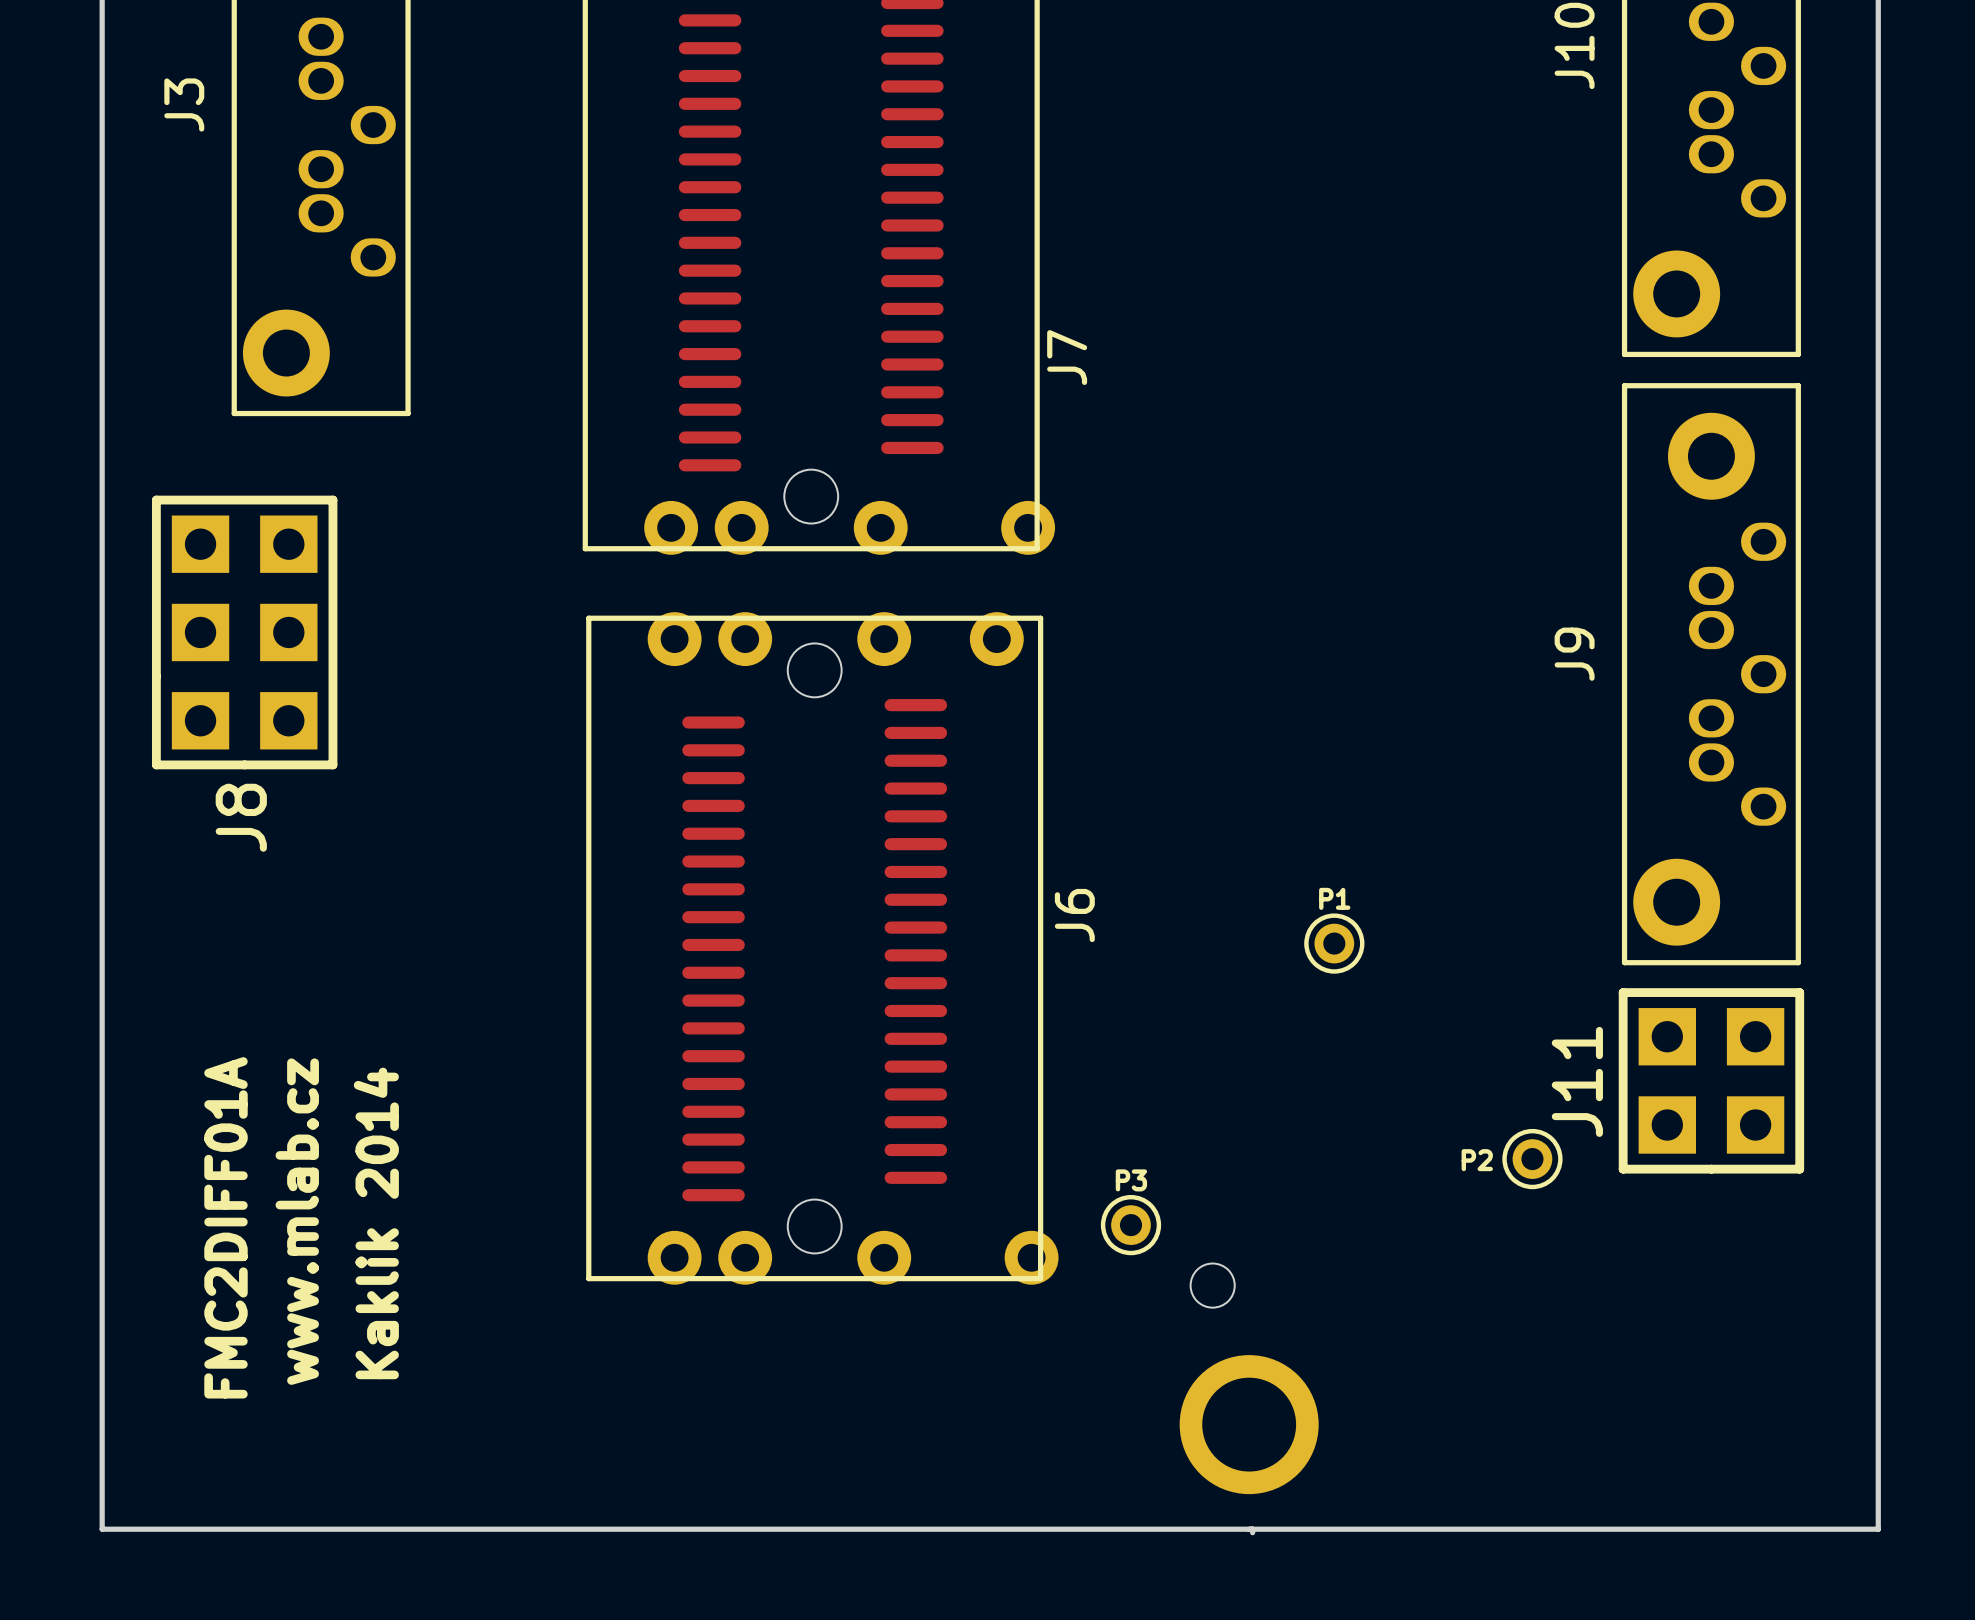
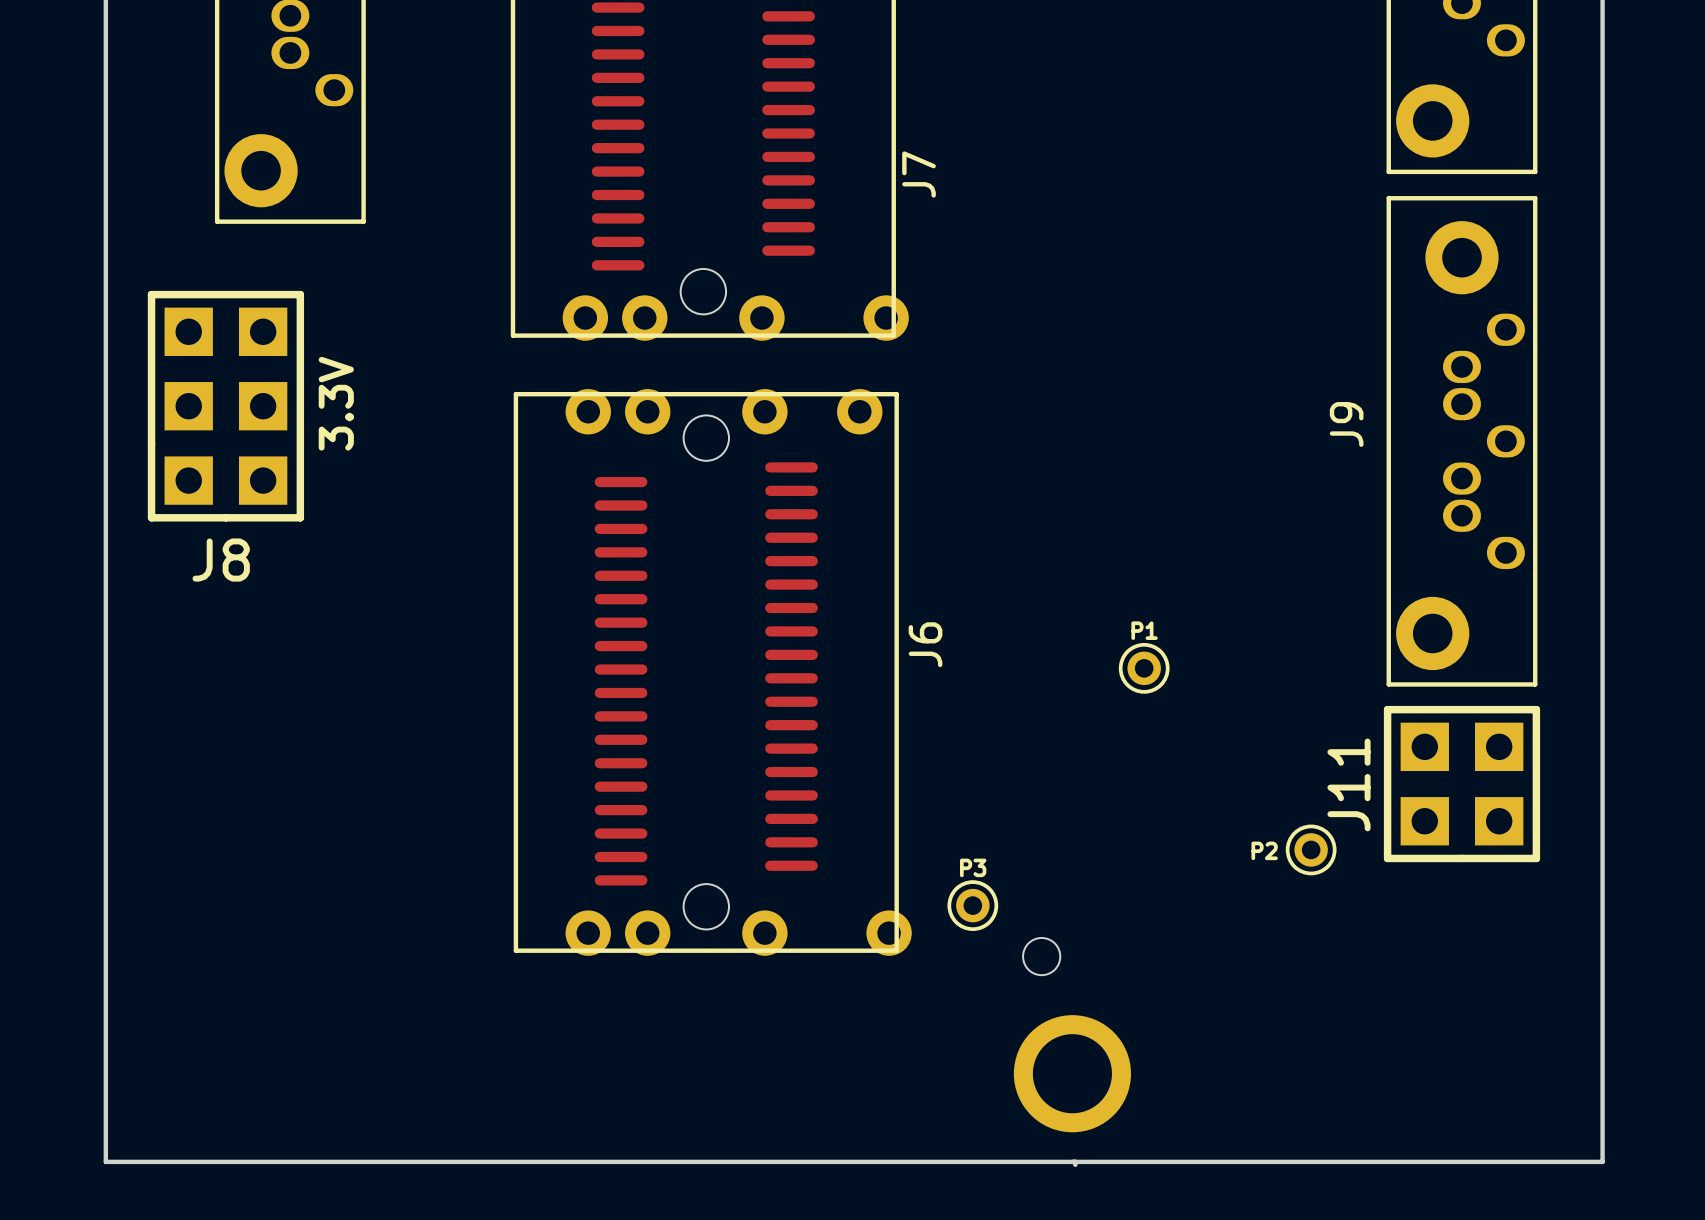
text: none -> 3.3V (336, 403)
J8 name rotation: 0° (241, 817) -> 90° clockwise (221, 560)
text: www.mlab.cz (297, 1221) -> none
text: Kaklik 2014 (376, 1223) -> none
text: FMC2DIFF01A (226, 1227) -> none

